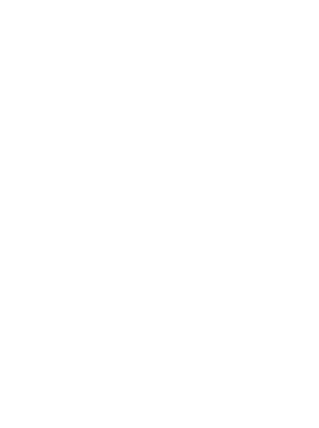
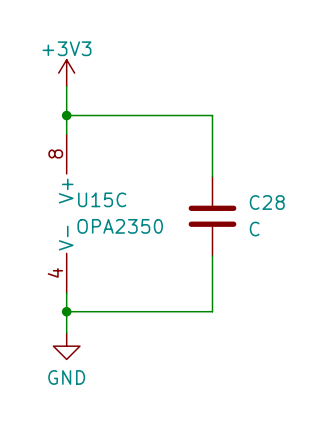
power symbol: none -> +3V3 (66, 73)
wire: none -> (66, 86) (66, 134)
wire: none -> (66, 115) (212, 115) (212, 176)
junction: none -> (66, 115)
U15C: none -> OPA2350 (66, 213)
C28: none -> C (212, 216)
wire: none -> (212, 256) (212, 311) (66, 311)
wire: none -> (66, 293) (66, 332)
junction: none -> (66, 311)
power symbol: none -> GND (66, 346)

